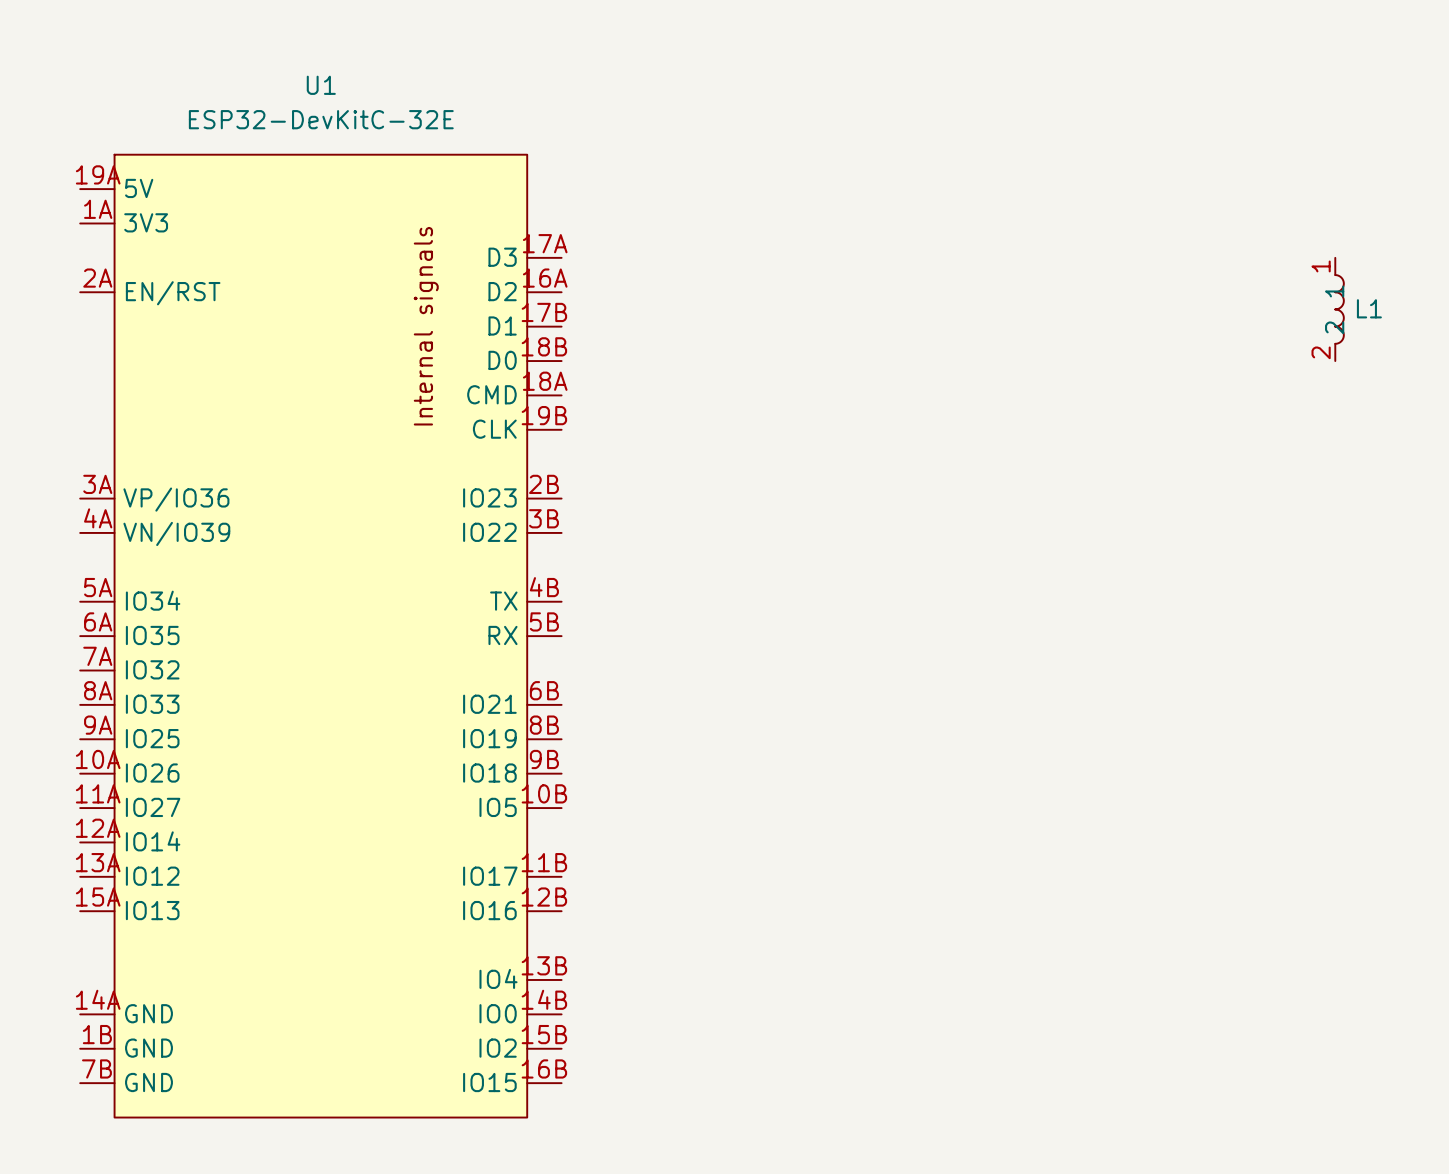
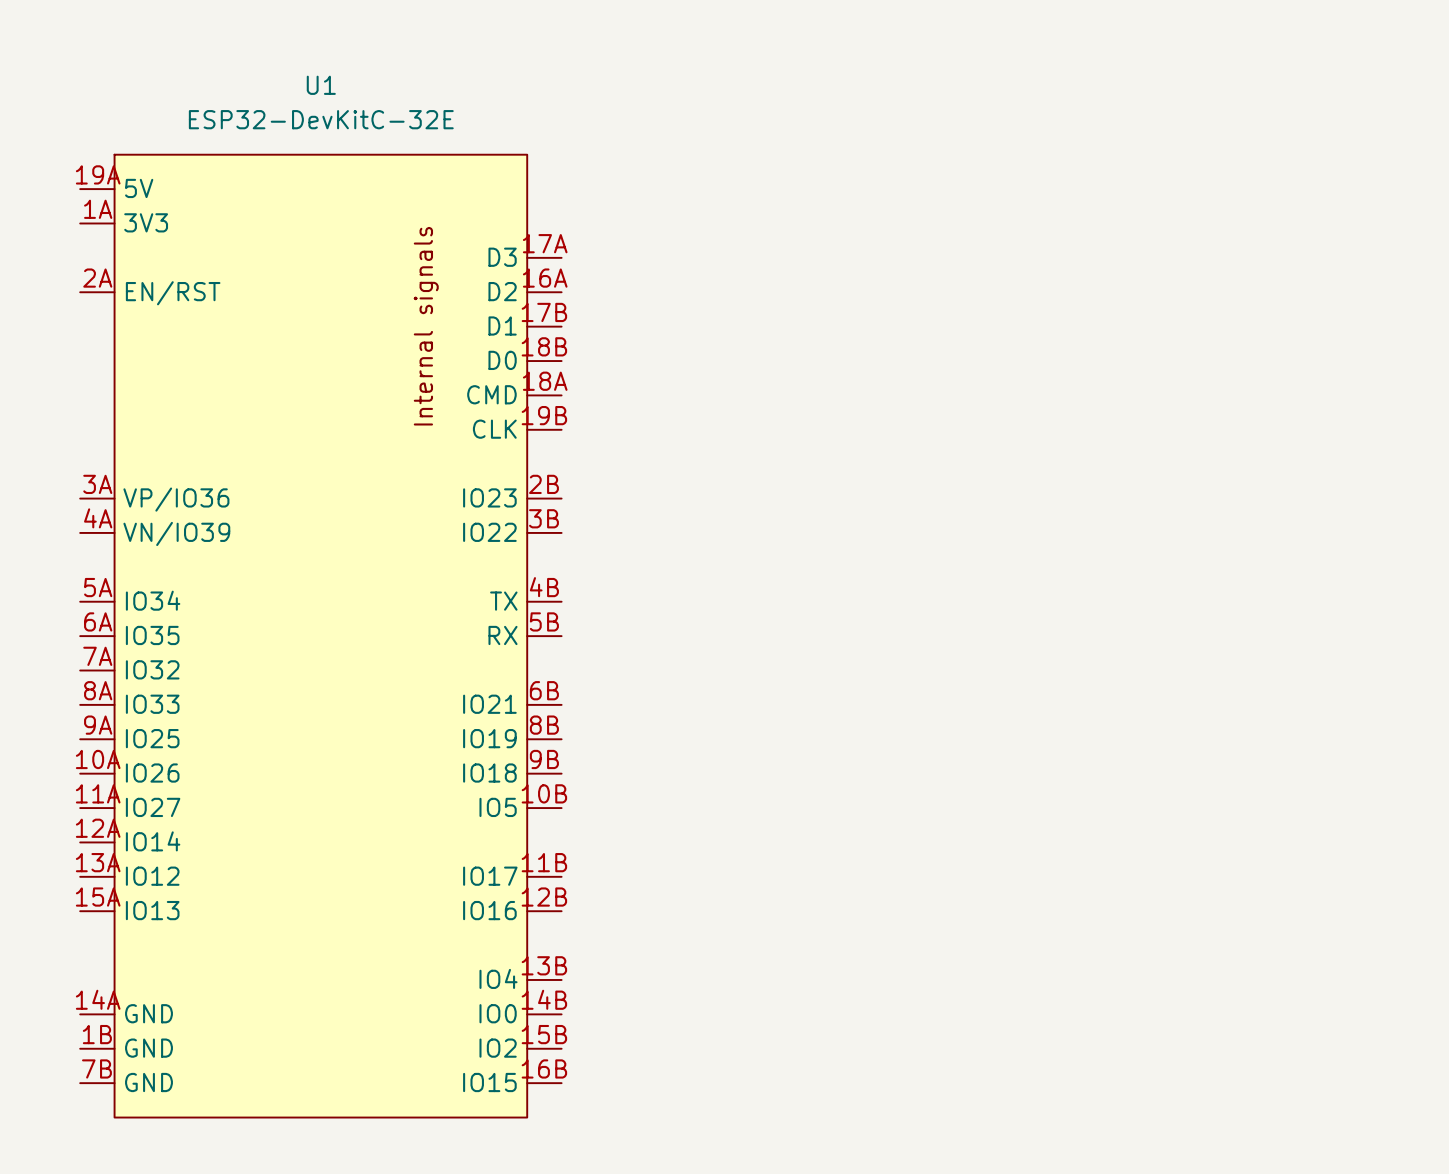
L1: (1339, 309) -> none

